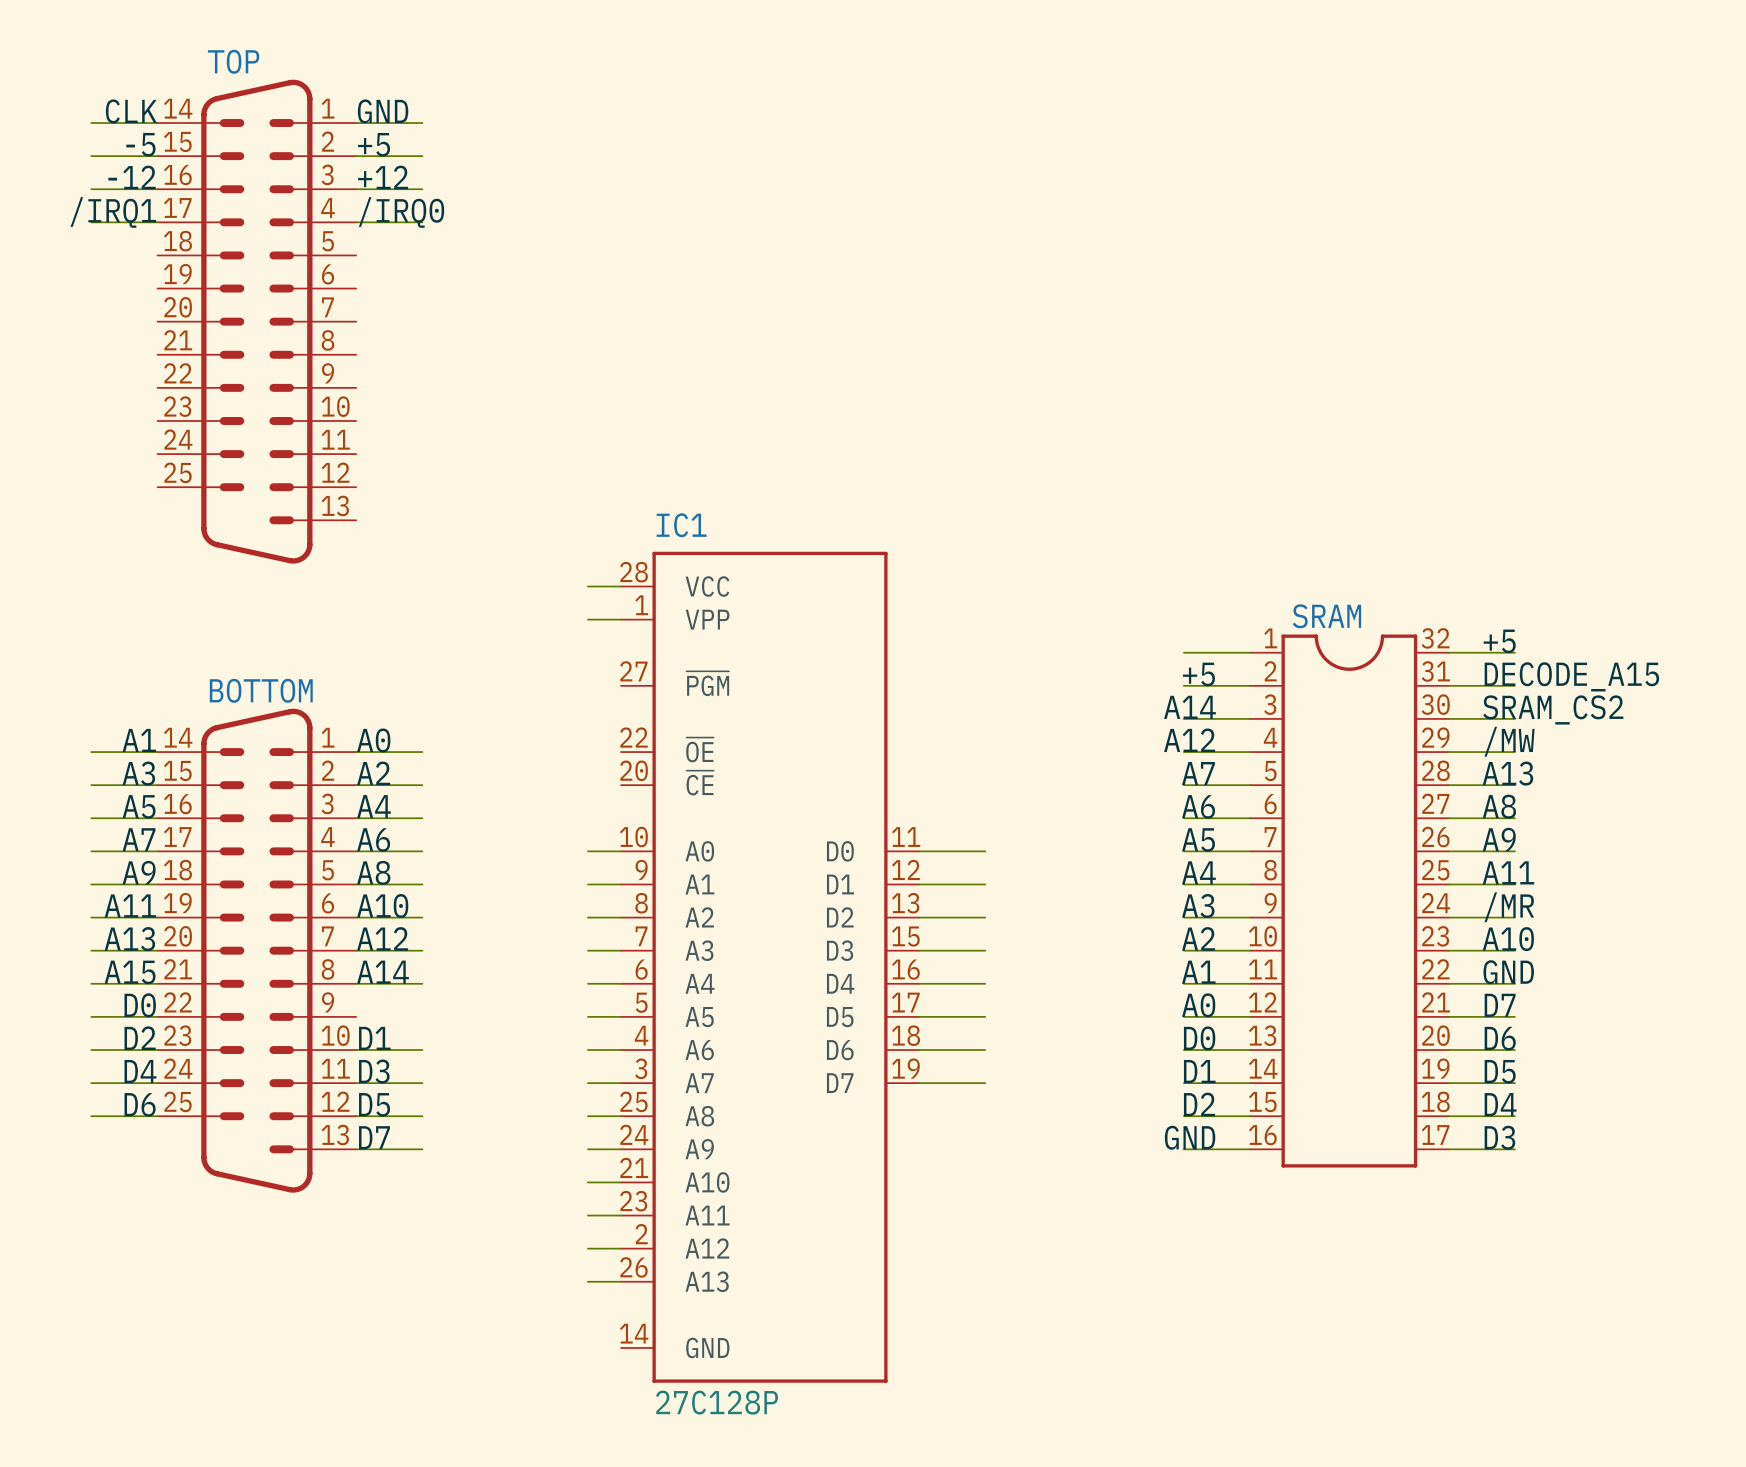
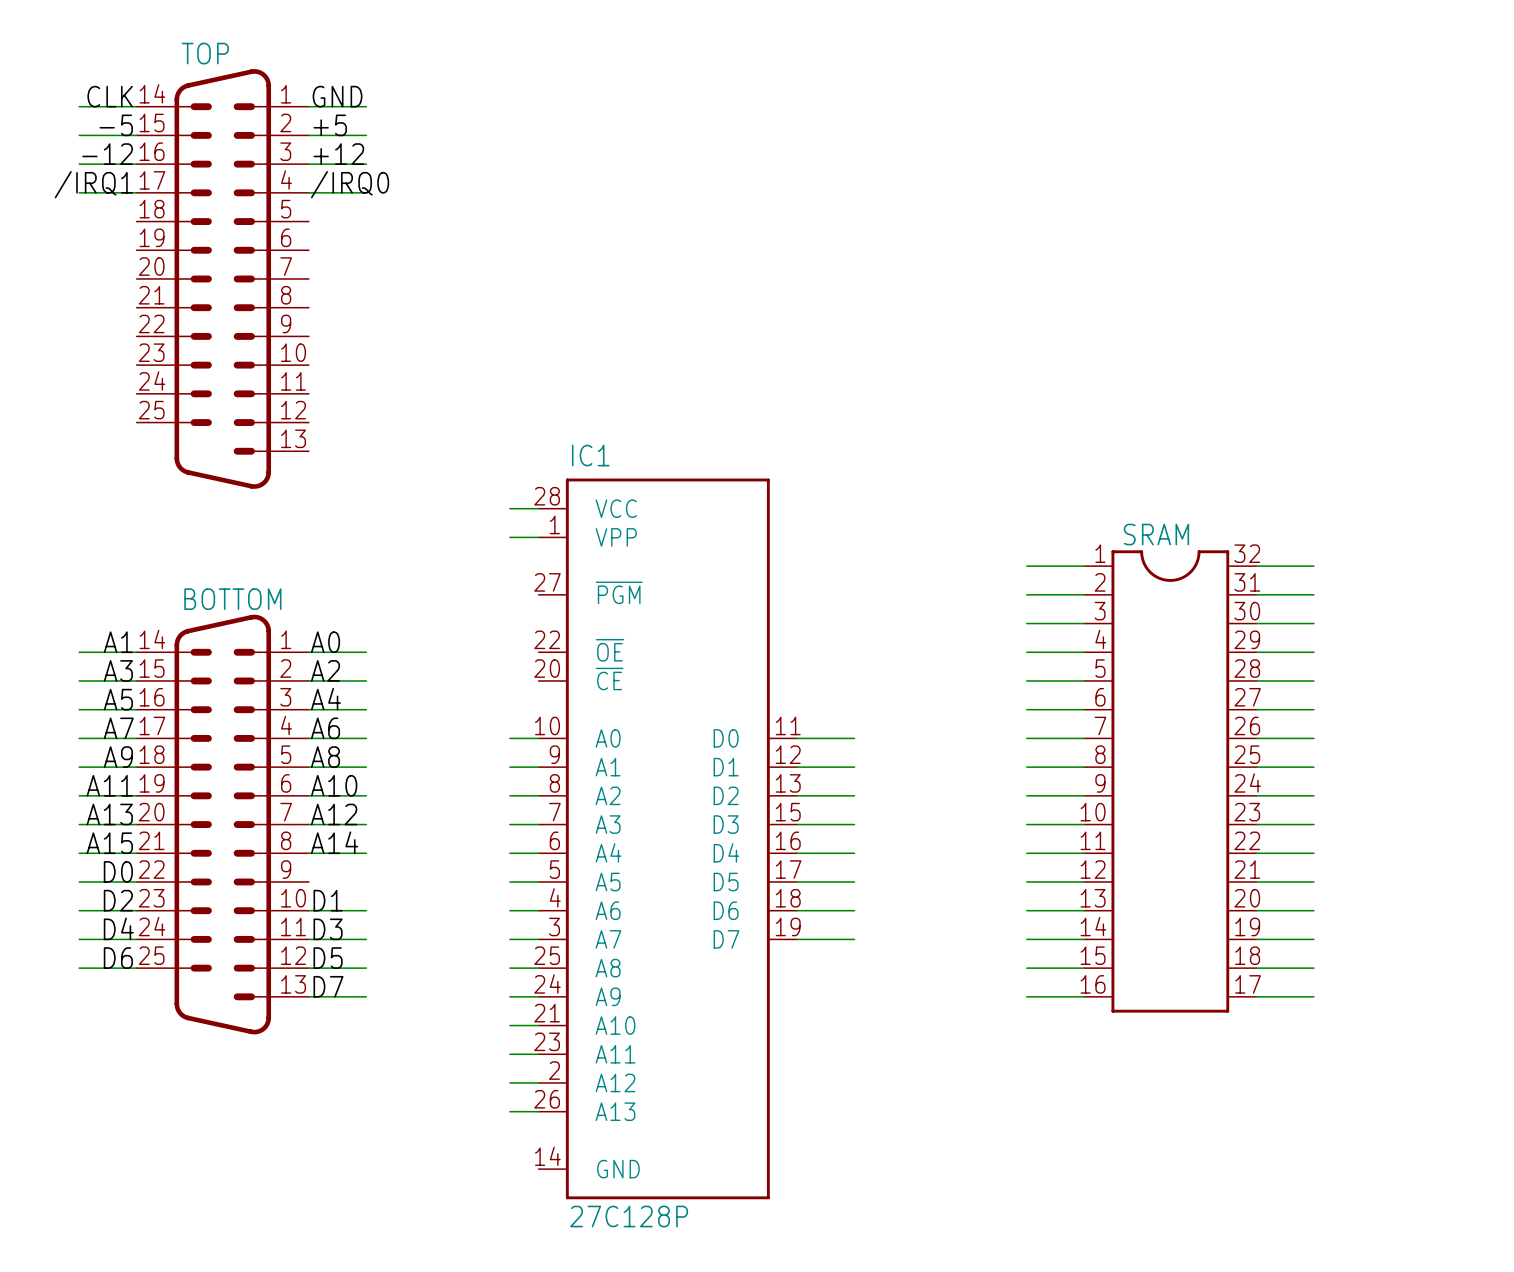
label: +5 (1499, 641) -> none
label: +5 (1198, 674) -> none
label: DECODE_A15 (1571, 676) -> none
label: A14 (1189, 707) -> none
label: SRAM_CS2 (1553, 709) -> none
label: A12 (1189, 740) -> none
label: /MW (1509, 741) -> none
label: A7 (1198, 773) -> none
label: A13 (1507, 773) -> none
label: A6 (1198, 806) -> none
label: A8 (1499, 806) -> none
label: A5 (1198, 839) -> none
label: A9 (1499, 839) -> none
label: A4 (1198, 872) -> none
label: A11 (1508, 872) -> none
label: A3 (1198, 905) -> none
label: /MR (1509, 907) -> none
label: A2 (1198, 938) -> none
label: A10 (1508, 939) -> none
label: A1 (1198, 972) -> none
label: GND (1508, 972) -> none
label: A0 (1198, 1005) -> none
label: D7 (1500, 1005) -> none
label: D0 (1199, 1038) -> none
label: D6 (1500, 1038) -> none
label: D1 (1199, 1071) -> none
label: D5 (1500, 1071) -> none
label: D2 (1199, 1104) -> none
label: D4 (1500, 1104) -> none
label: GND (1190, 1137) -> none
label: D3 (1499, 1137) -> none

